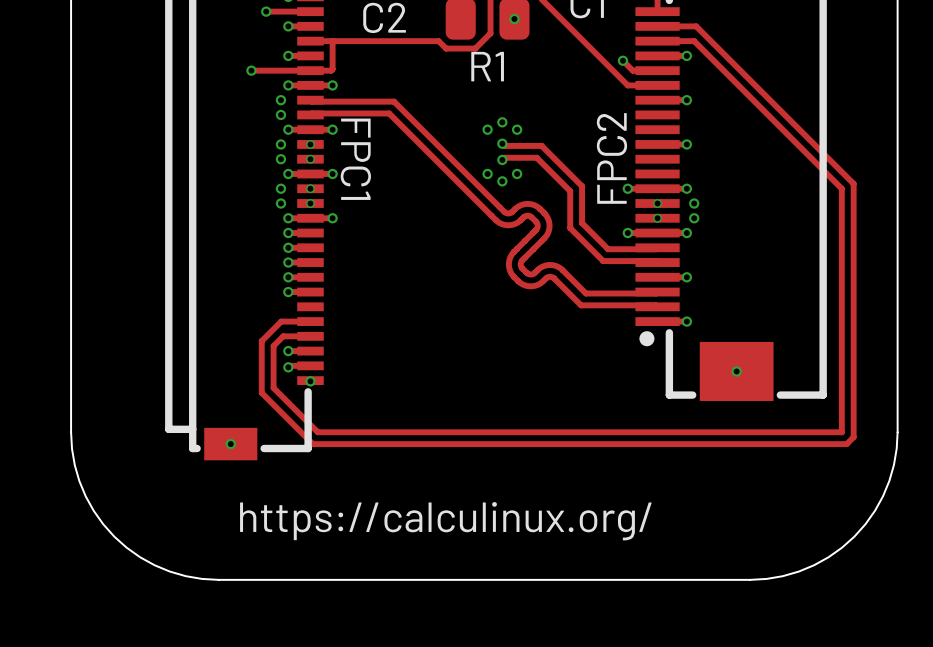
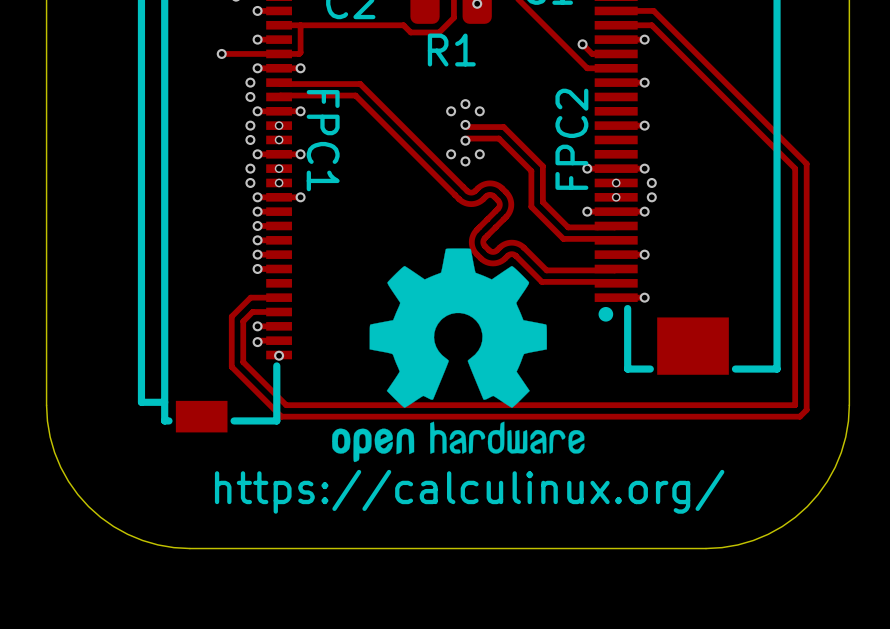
drawing: none -> [332, 248, 585, 463]
via: (736, 371) -> none
via: (230, 444) -> none

